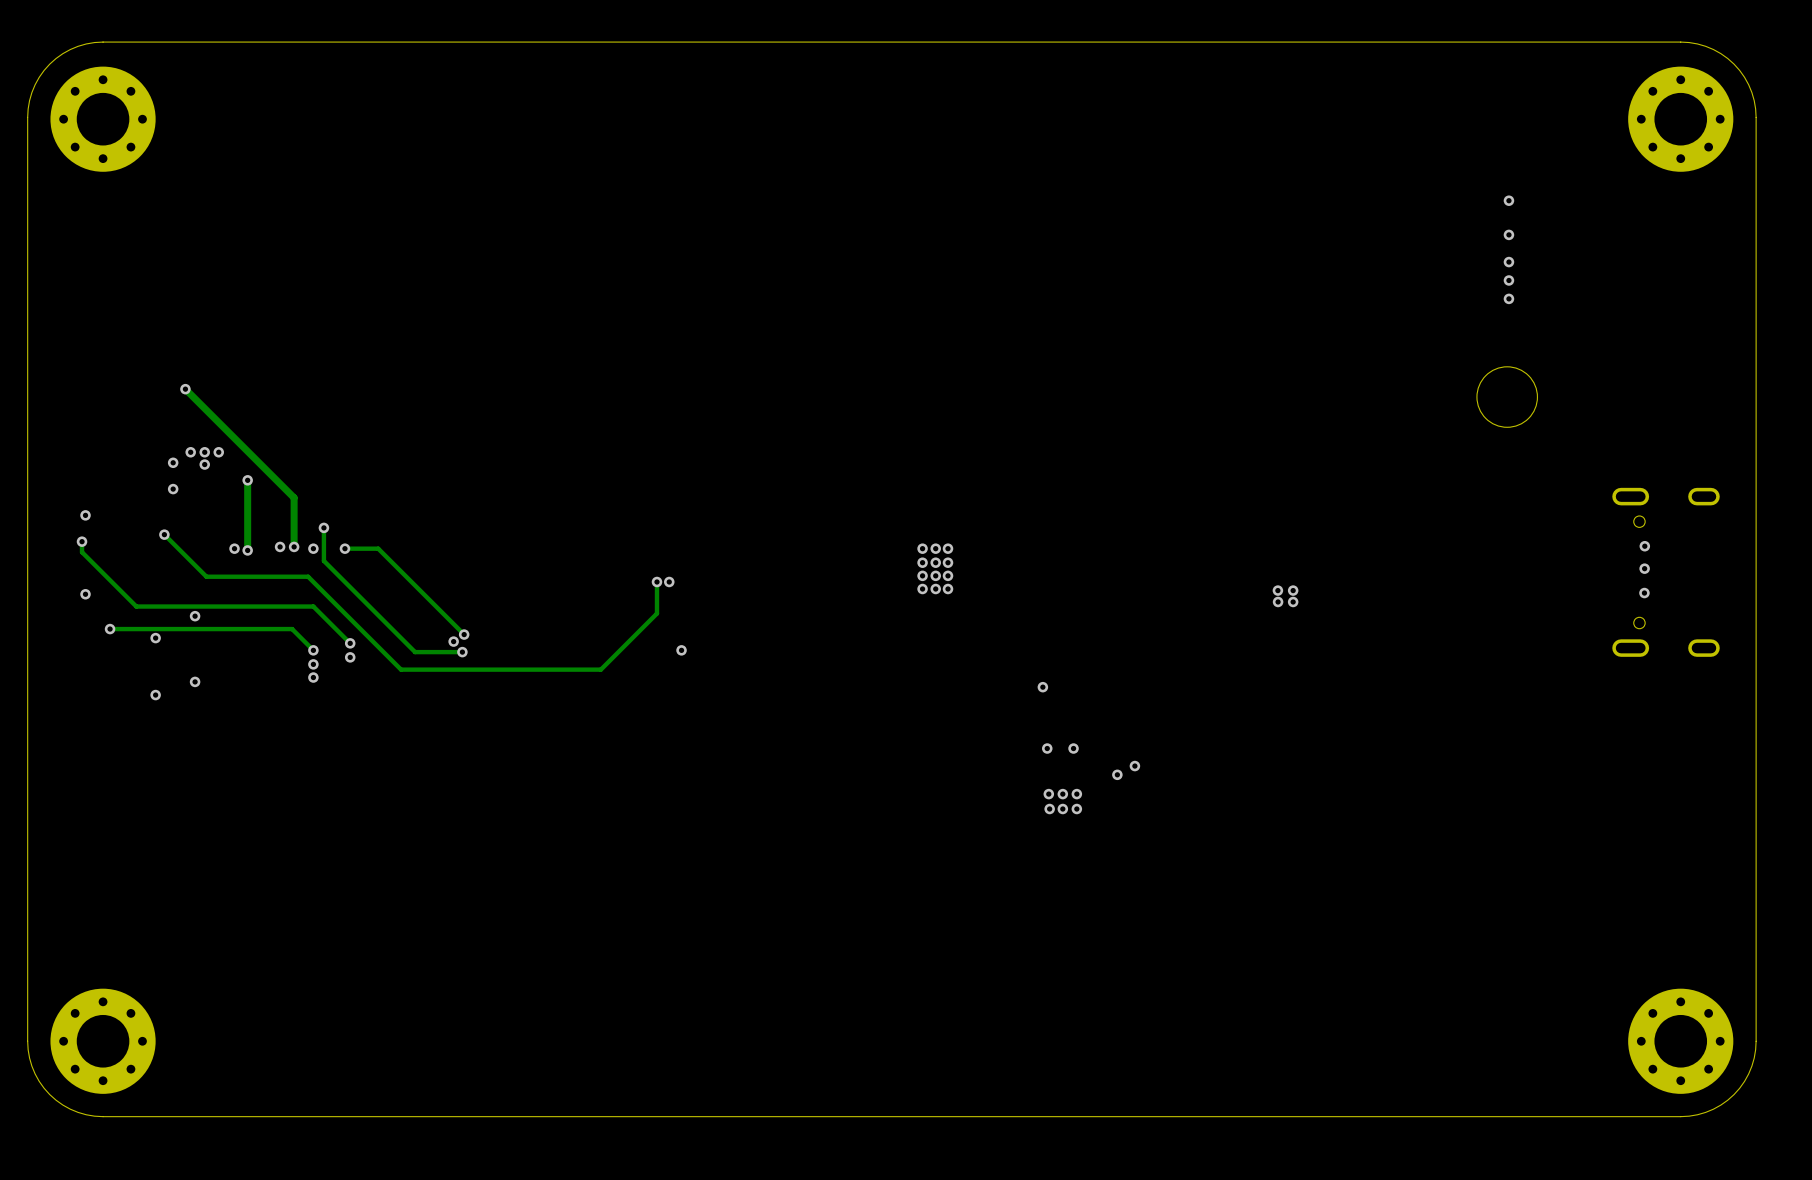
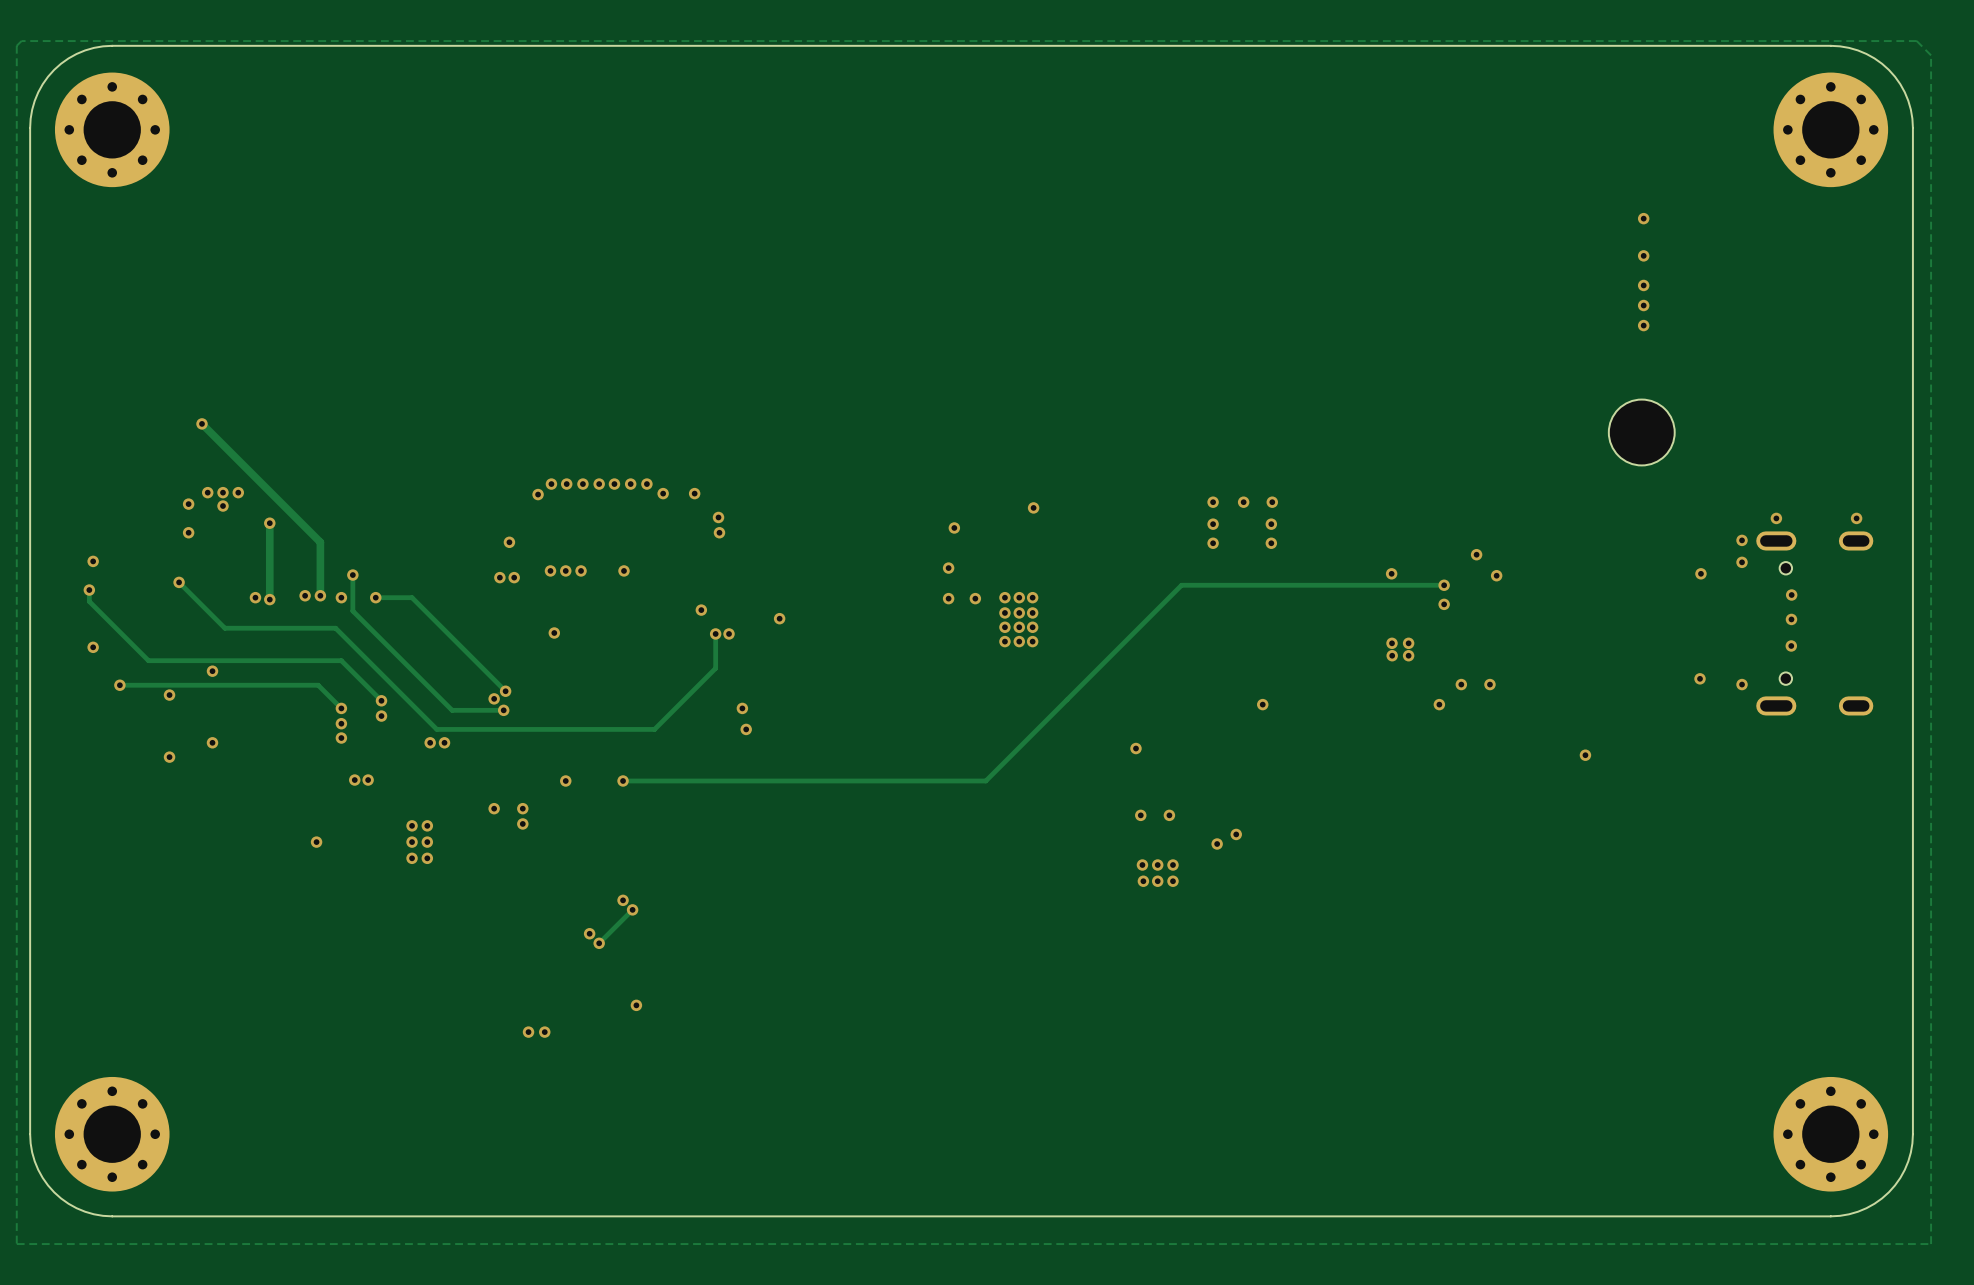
zone outline: none -> (1916, 41) (21, 41) (16, 45) (16, 1244) (1931, 1244) (1931, 55) (1916, 41)
via: none -> (551, 484)
via: none -> (566, 484)
via: none -> (582, 484)
via: none -> (599, 484)
via: none -> (614, 484)
via: none -> (630, 484)
via: none -> (646, 484)
via: none -> (663, 493)
via: none -> (694, 493)
via: none -> (538, 494)
via: none -> (1213, 502)
via: none -> (1243, 502)
via: none -> (1272, 502)
via: none -> (1033, 507)
via: none -> (718, 517)
via: none -> (1776, 518)
via: none -> (1856, 518)
via: none -> (1213, 524)
via: none -> (1271, 524)
via: none -> (954, 527)
via: none -> (719, 532)
via: none -> (1742, 540)
via: none -> (509, 542)
via: none -> (1213, 543)
via: none -> (1271, 543)
via: none -> (1476, 554)
via: none -> (1742, 562)
via: none -> (948, 568)
via: none -> (550, 570)
via: none -> (565, 570)
via: none -> (581, 570)
via: none -> (624, 570)
via: none -> (1391, 573)
via: none -> (1700, 573)
via: none -> (1496, 575)
via: none -> (499, 577)
via: none -> (514, 577)
track: none -> (1444, 585) (1181, 585) (985, 780) (623, 780)
via: none -> (1444, 585)
via: none -> (948, 598)
via: none -> (975, 598)
via: none -> (1444, 604)
via: none -> (701, 610)
via: none -> (779, 618)
via: none -> (554, 633)
via: none -> (1700, 678)
via: none -> (1461, 684)
via: none -> (1489, 684)
via: none -> (1742, 684)
via: none -> (1262, 704)
via: none -> (1439, 704)
via: none -> (746, 729)
via: none -> (430, 742)
via: none -> (444, 742)
via: none -> (1585, 755)
via: none -> (354, 780)
via: none -> (368, 780)
via: none -> (565, 780)
via: none -> (623, 780)
via: none -> (494, 808)
via: none -> (522, 808)
via: none -> (522, 823)
via: none -> (412, 825)
via: none -> (427, 825)
via: none -> (316, 842)
via: none -> (412, 842)
via: none -> (427, 842)
via: none -> (412, 858)
via: none -> (427, 858)
via: none -> (623, 900)
track: none -> (632, 909) (599, 943)
via: none -> (632, 909)
via: none -> (589, 933)
via: none -> (599, 943)
via: none -> (636, 1005)
via: none -> (528, 1032)
via: none -> (544, 1032)

